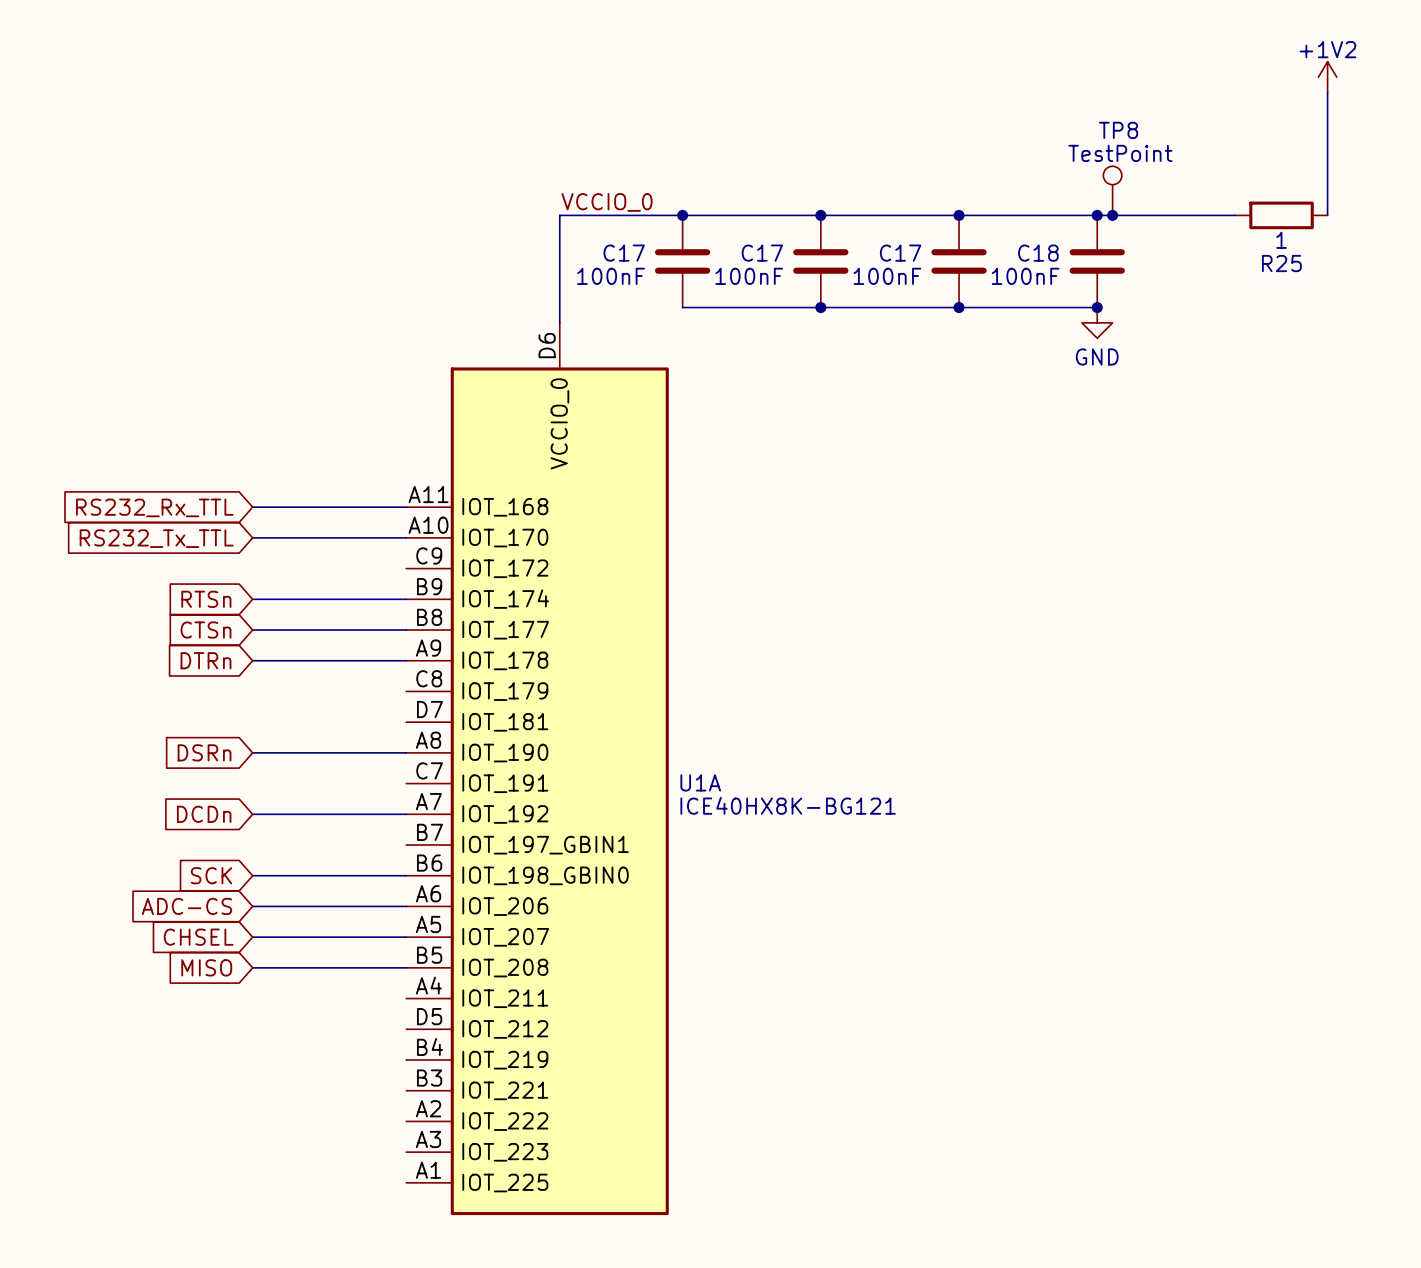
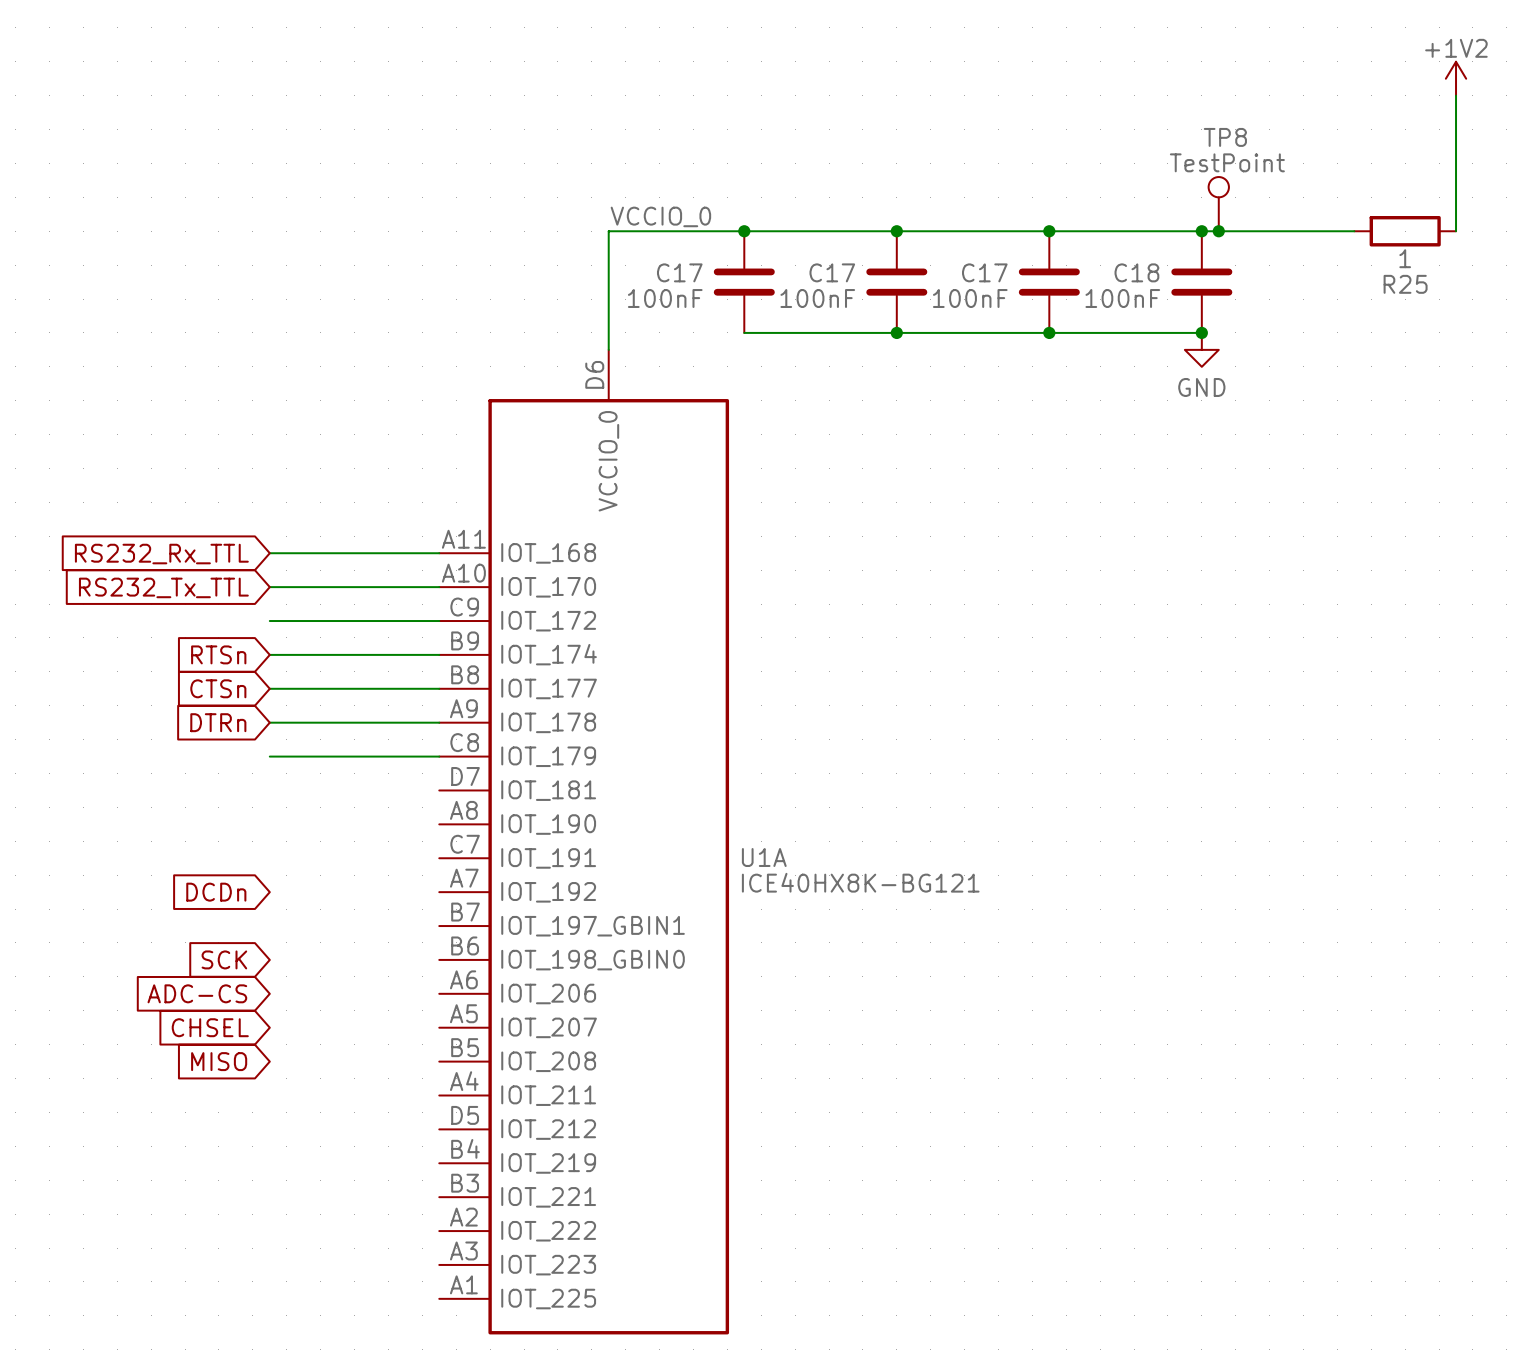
global label: DSRn (204, 752) -> none
wire: (252, 752) (406, 752) -> (269, 621) (439, 621)
wire: (252, 814) (406, 814) -> none
wire: (252, 875) (406, 875) -> (269, 756) (439, 756)
wire: (252, 906) (406, 906) -> none
wire: (252, 937) (406, 937) -> none
wire: (252, 967) (406, 967) -> none

